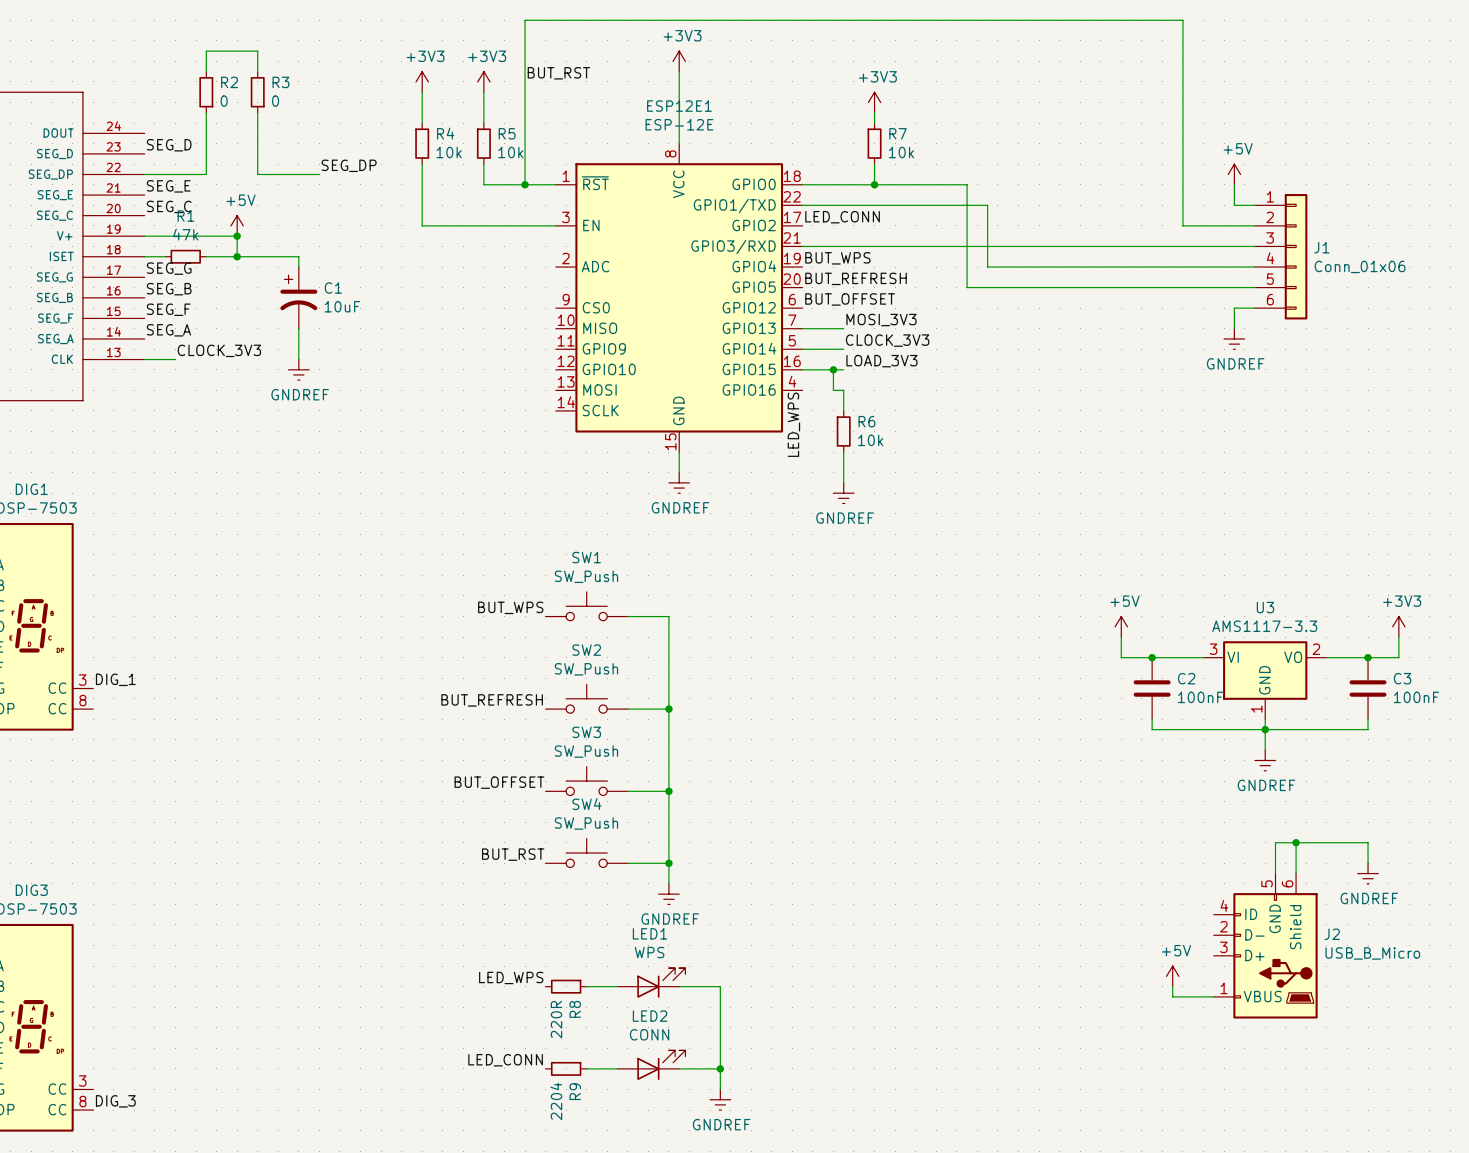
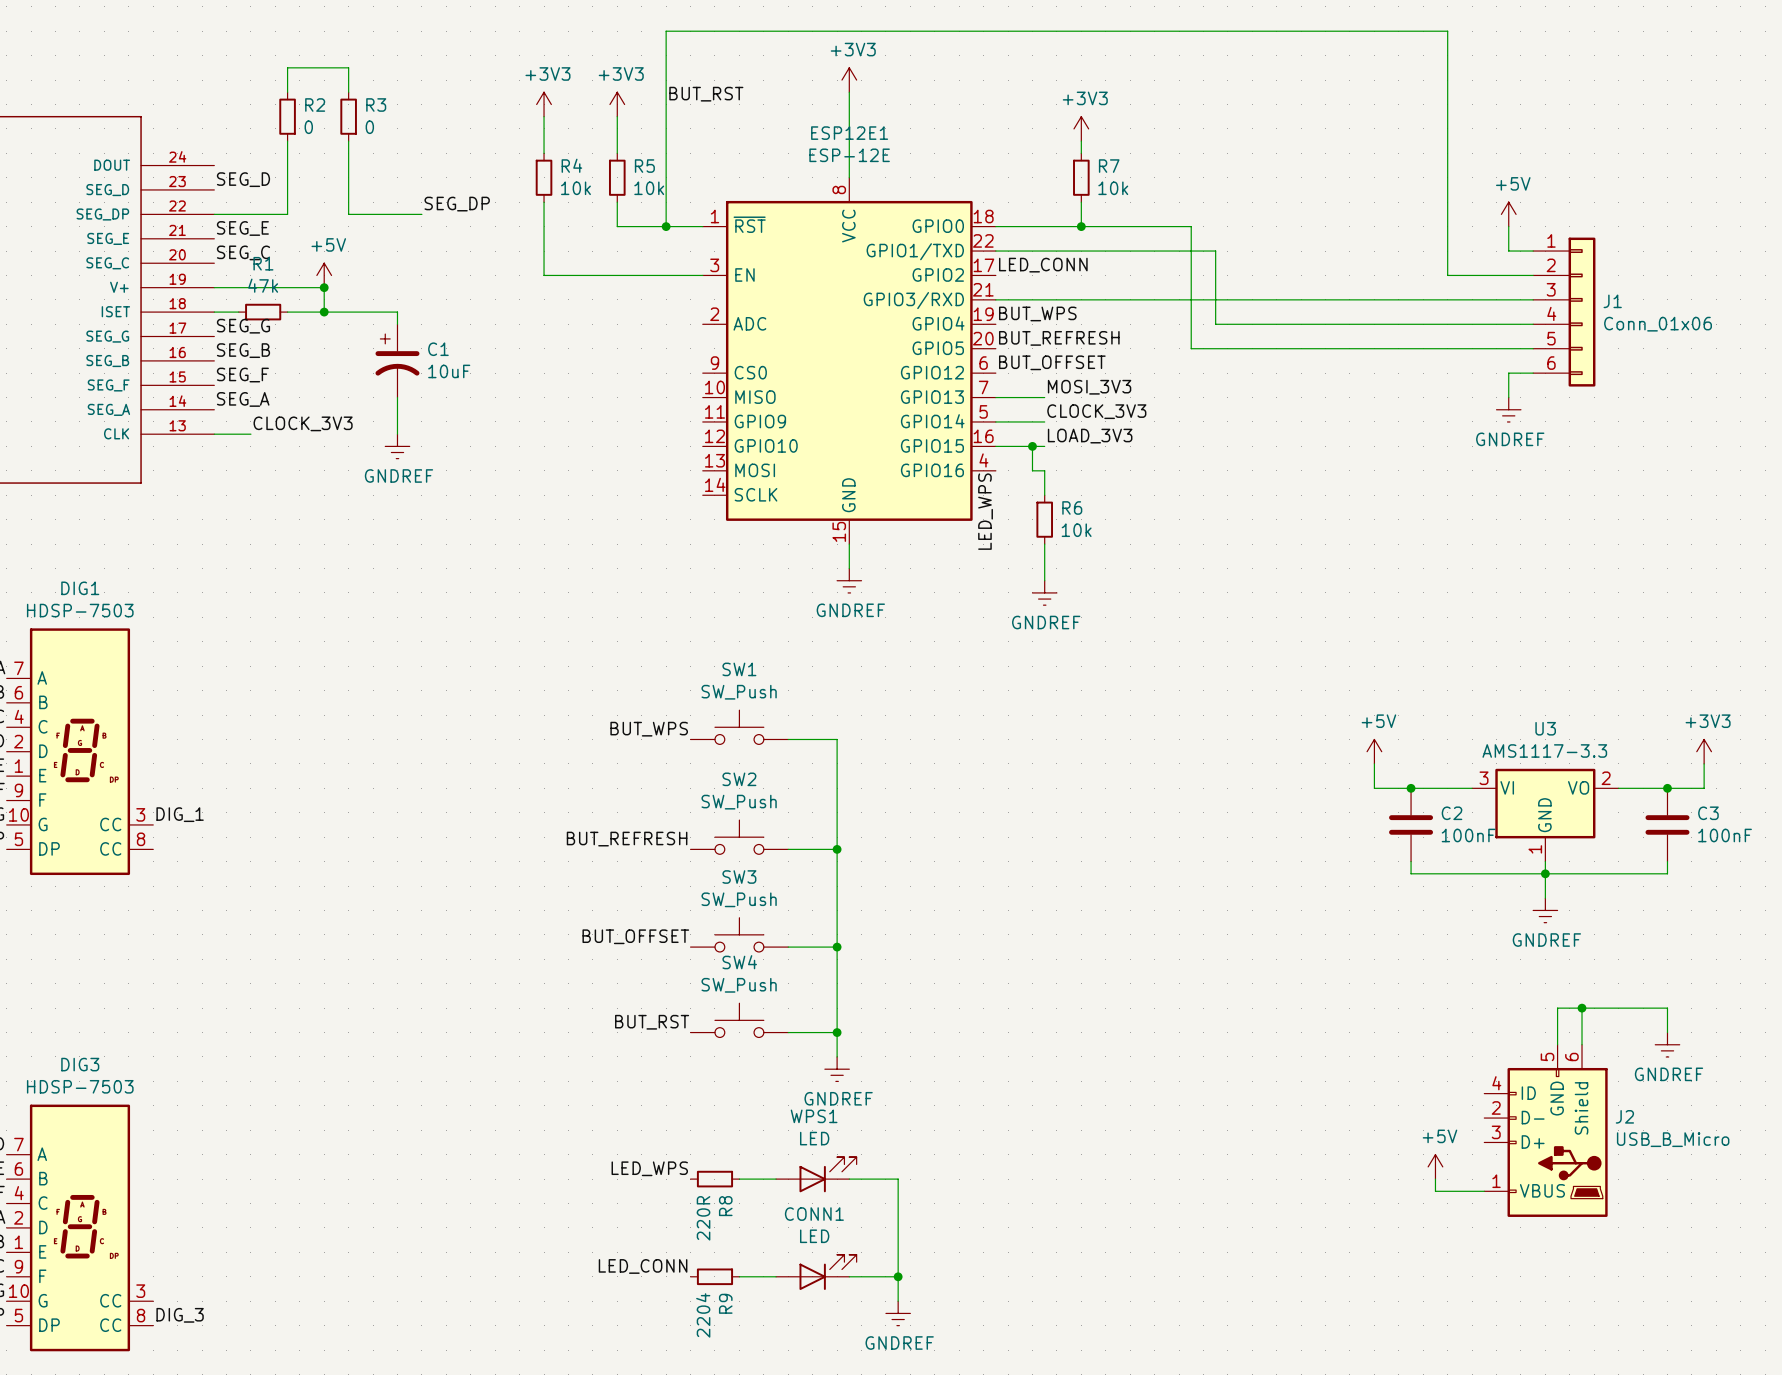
LED1 name: LED1 (650, 933) -> WPS1 (814, 1116)
LED1 value: WPS (649, 952) -> LED (814, 1138)
LED2 name: LED2 (650, 1016) -> CONN1 (814, 1214)
LED2 value: CONN (649, 1034) -> LED (814, 1236)

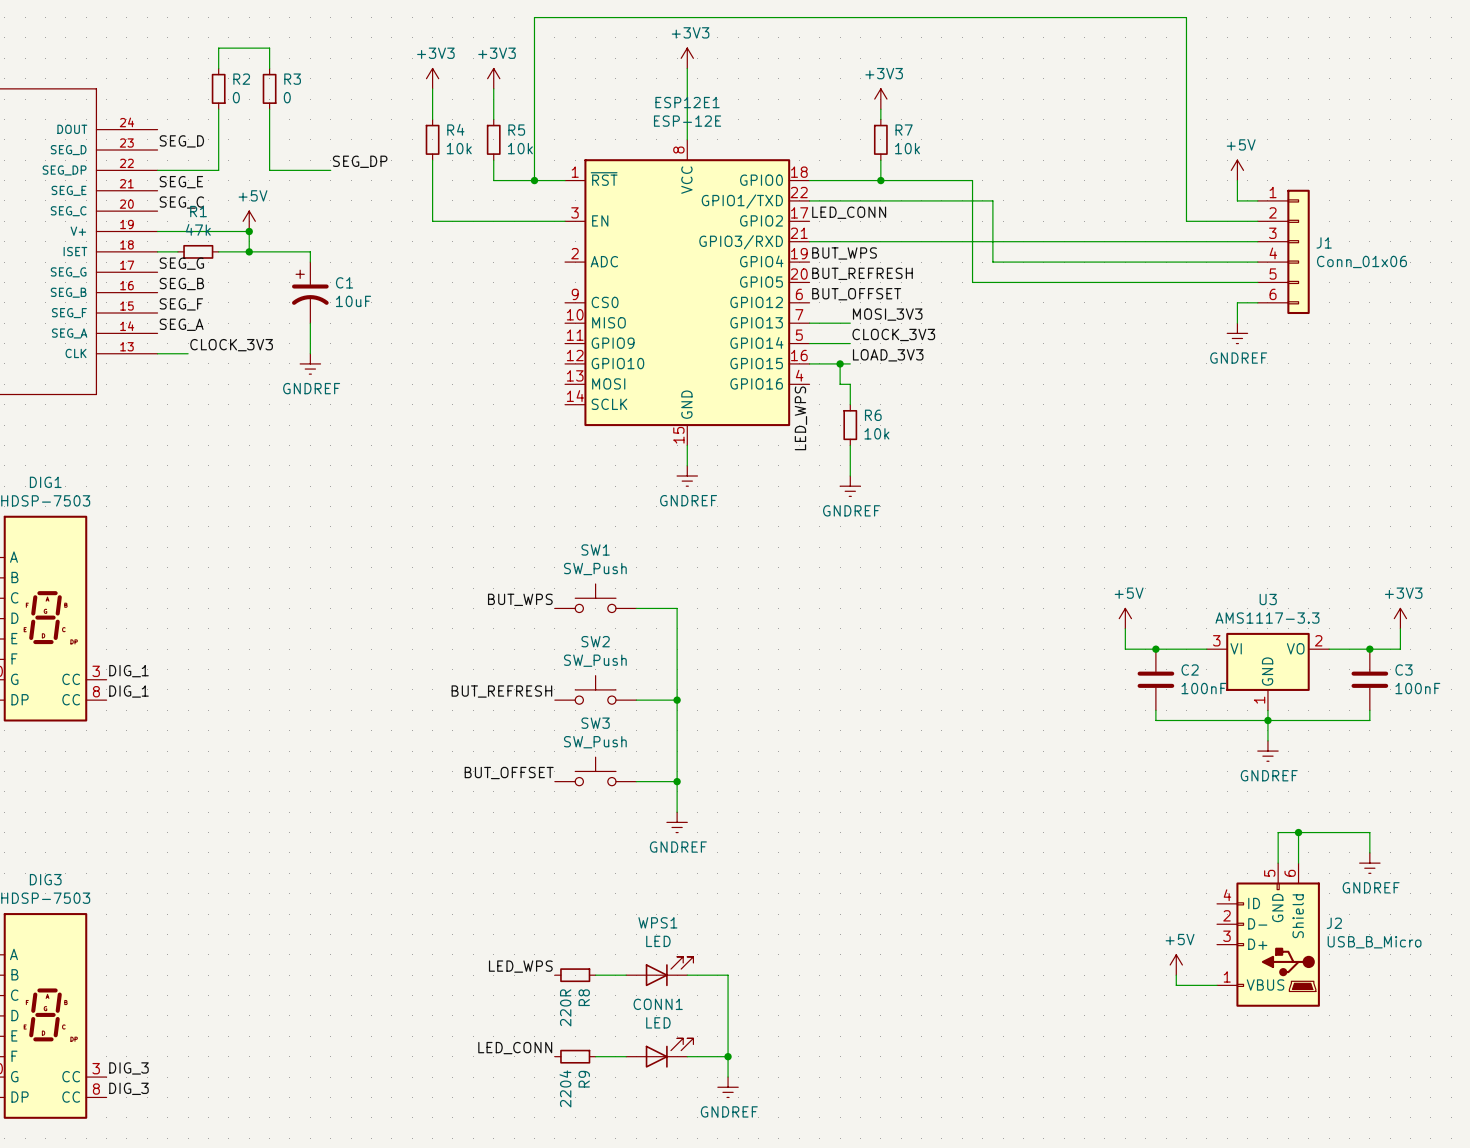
label: BUT_RST (706, 94) -> none
label: none -> DIG_1 (129, 691)
wire: (837, 983) (837, 1056) -> none
SW4: SW_Push (739, 1020) -> none
label: BUT_RST (652, 1022) -> none
wire: (788, 1032) (837, 1032) -> none
junction: (837, 1032) -> none
power symbol position: GNDREF (837, 1069) -> GNDREF (677, 822)
label: none -> DIG_3 (129, 1068)

